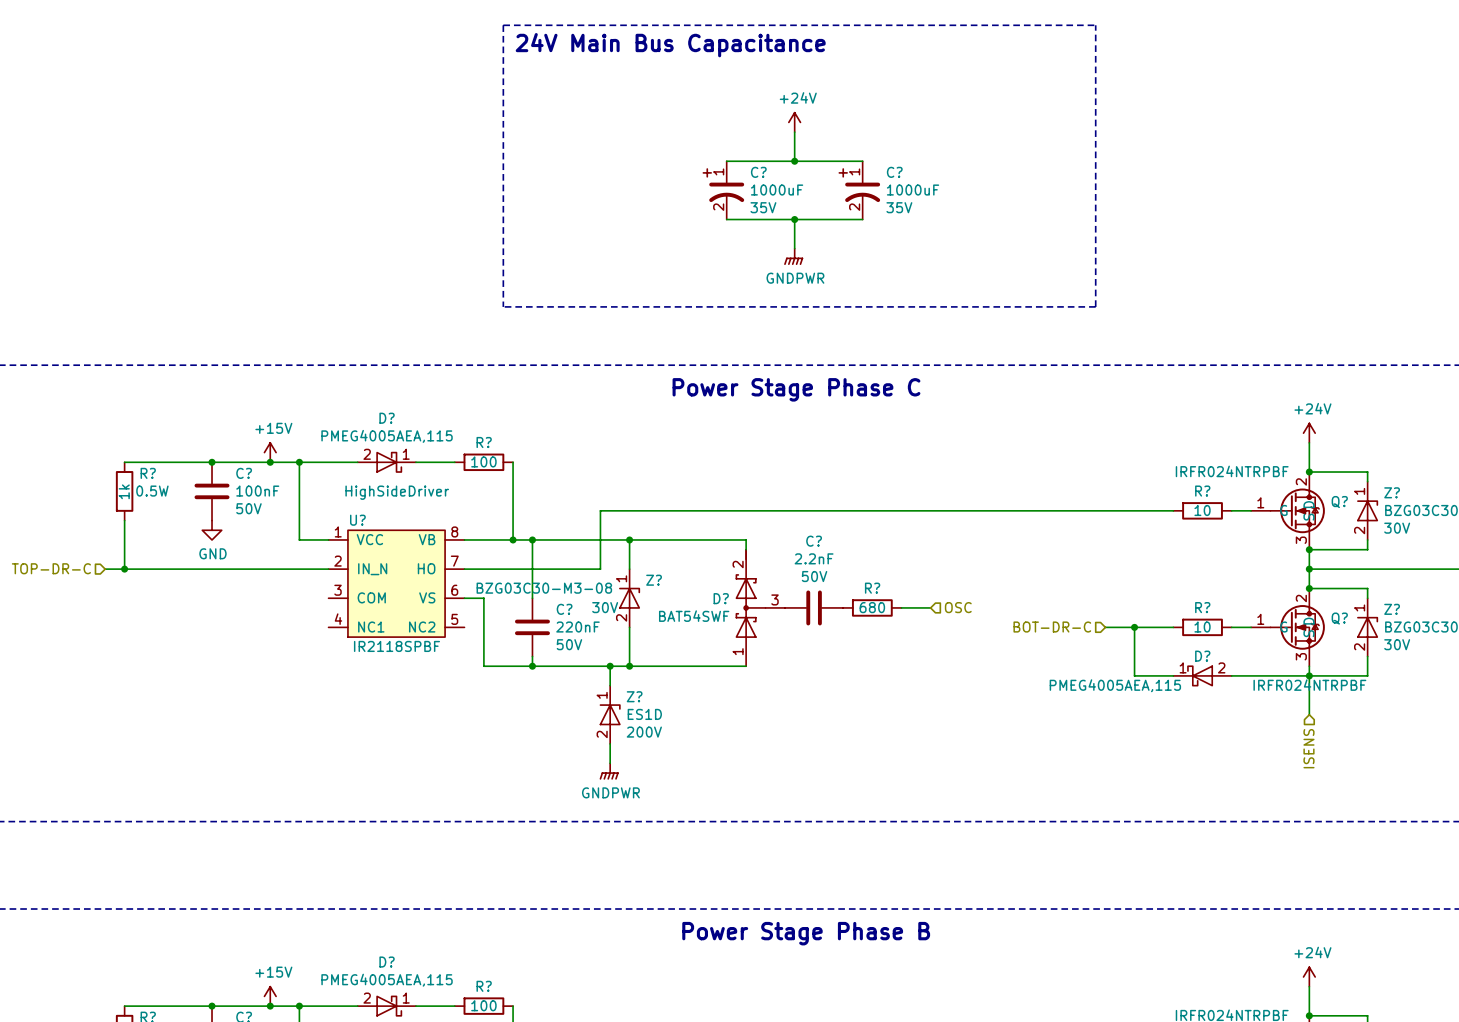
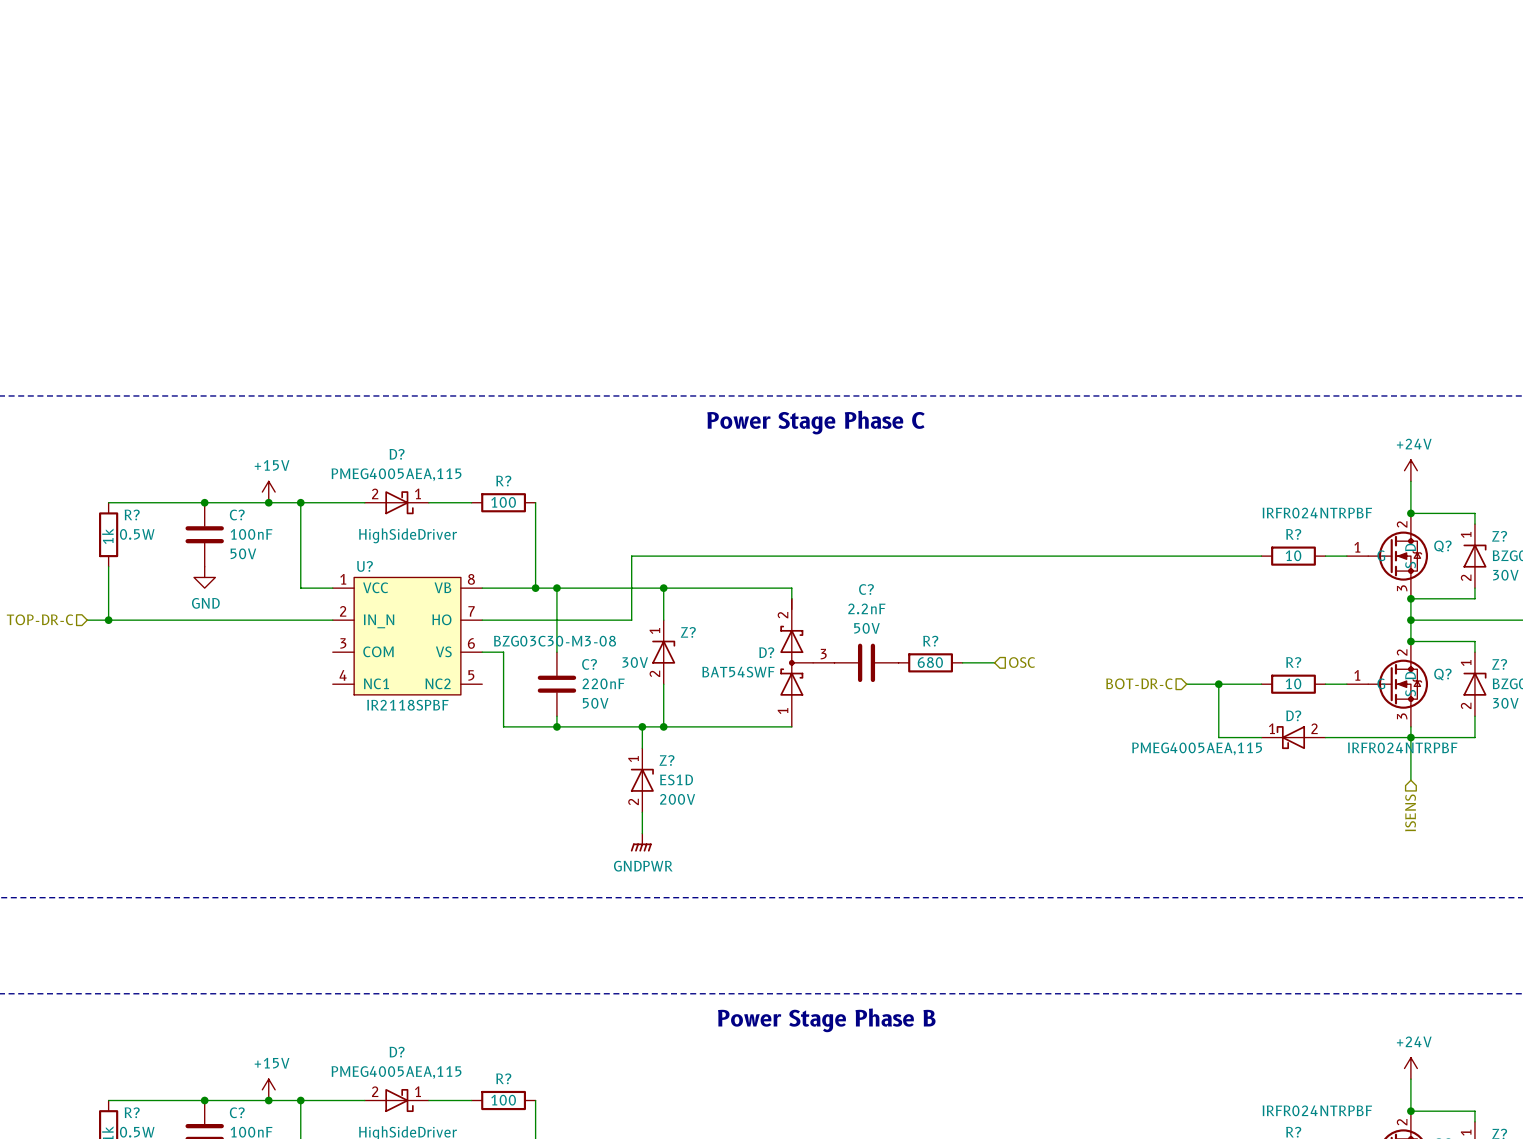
line: (503, 25) (1095, 25) (1095, 306) (503, 306) (503, 25) -> none
text: 24V Main Bus Capacitance (670, 45) -> none
power symbol: +24V (794, 122) -> none
wire: (794, 132) (794, 161) -> none
wire: (726, 161) (862, 161) -> none
junction: (794, 161) -> none
C?: (723, 190) -> none
C?: (859, 190) -> none
wire: (726, 219) (862, 219) -> none
wire: (794, 219) (794, 248) -> none
junction: (794, 219) -> none
power symbol: GNDPWR (793, 256) -> none

